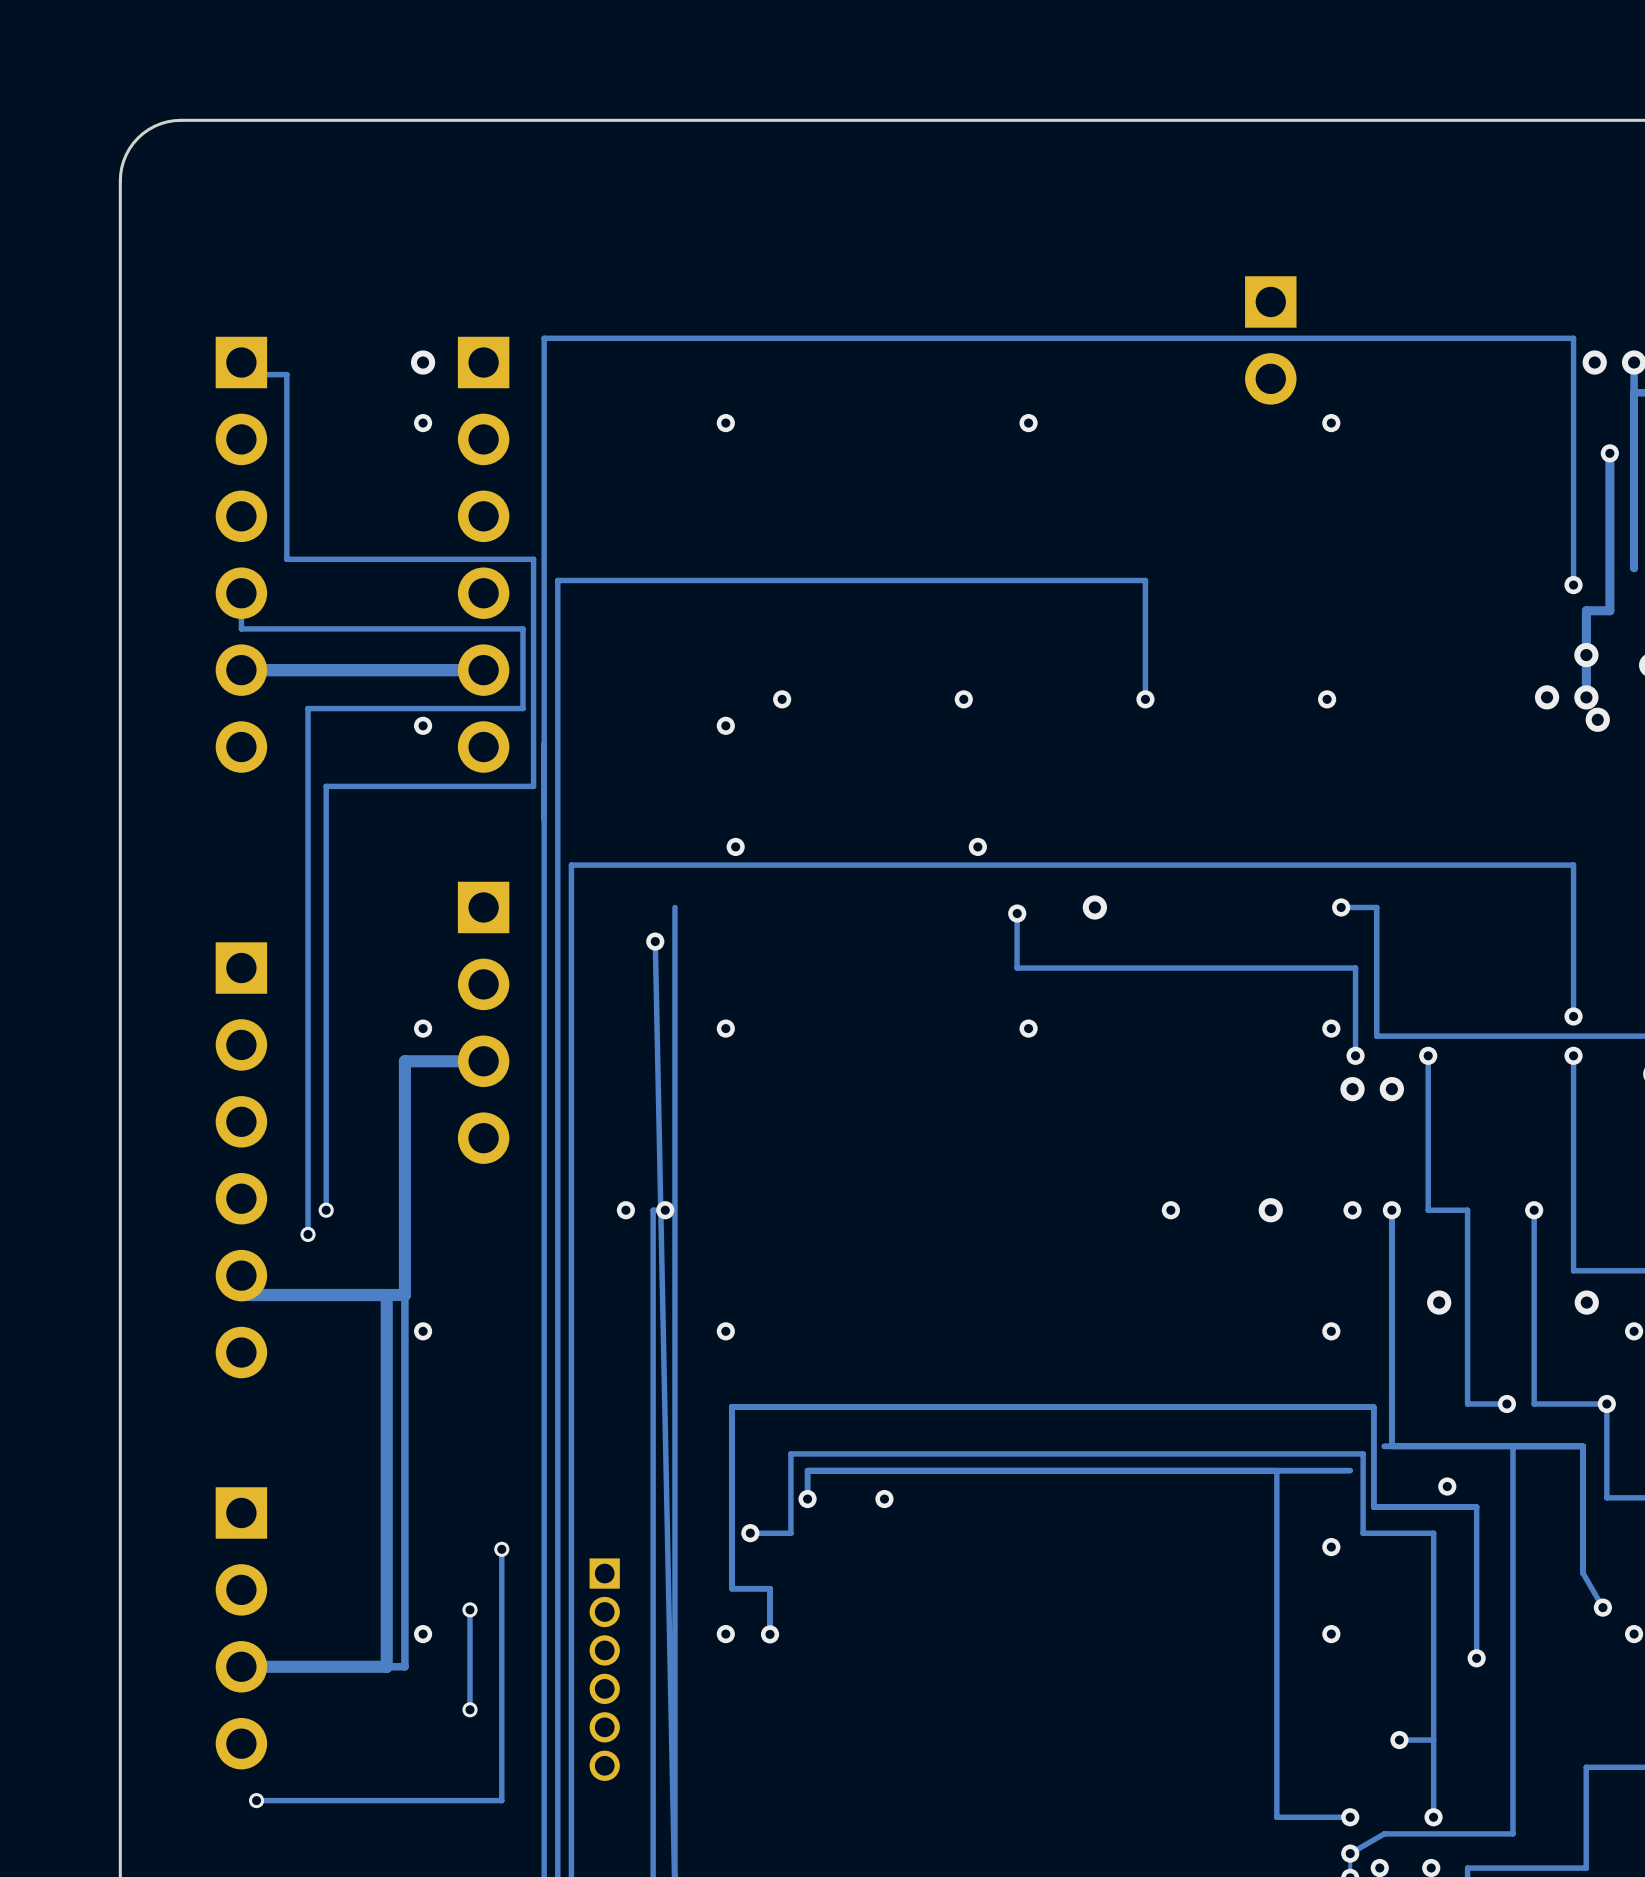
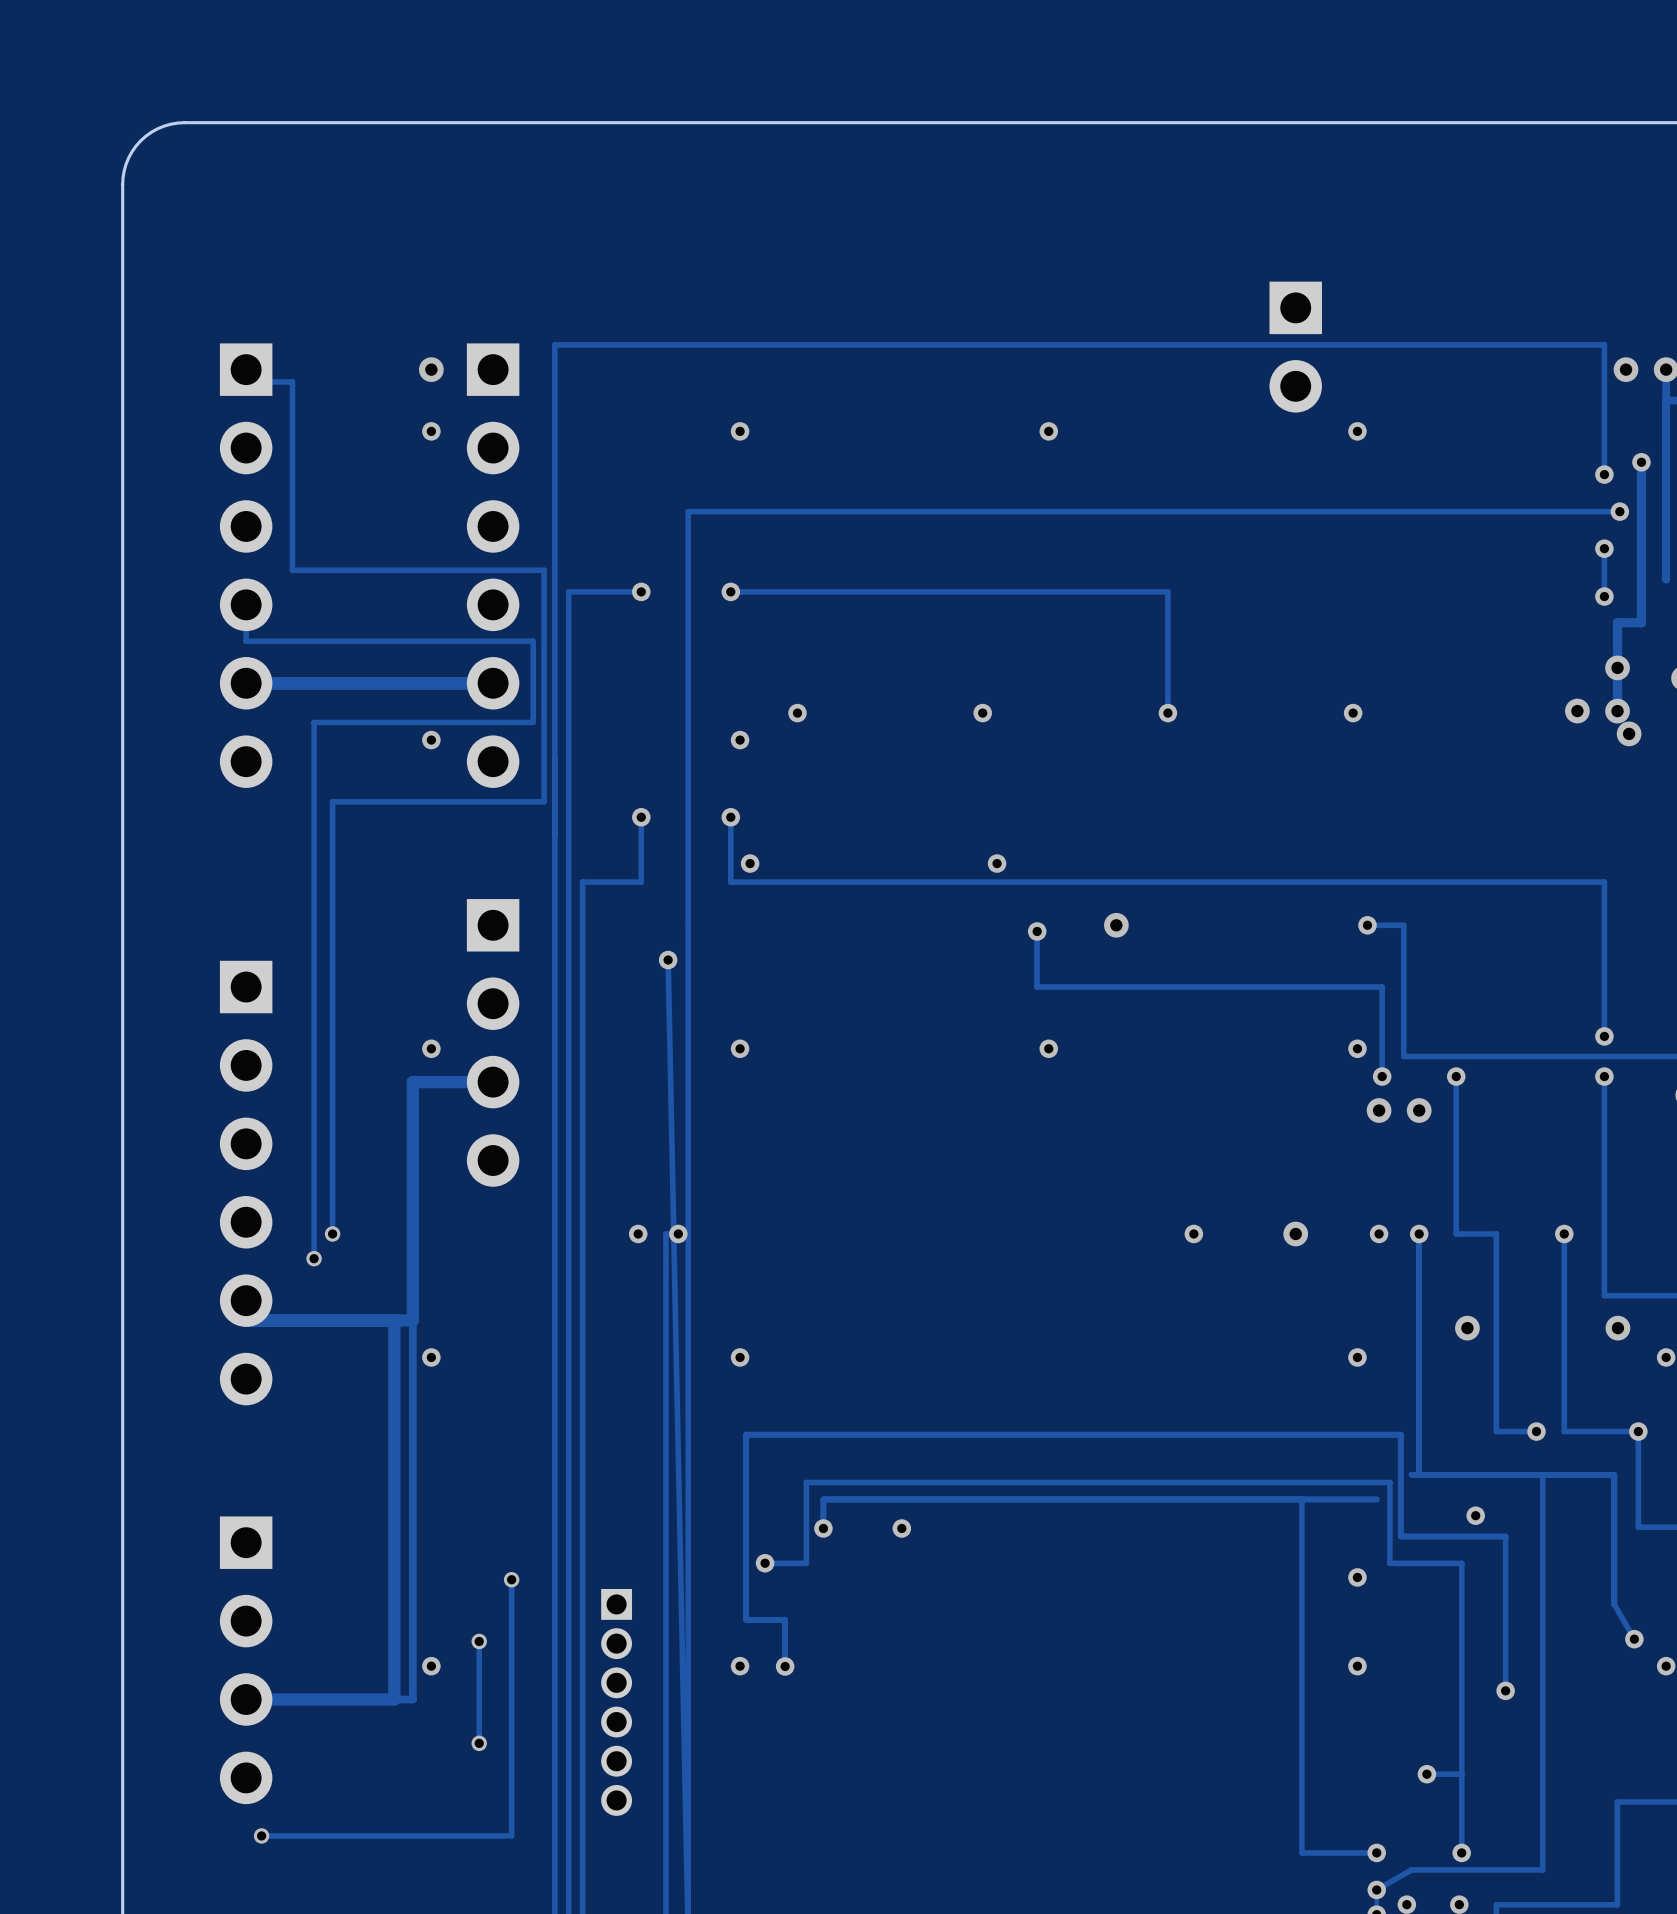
track: (1573, 465) (1573, 538) -> none
via: none -> (1604, 474)
track: none -> (1619, 511) (688, 511) (688, 925)
via: none -> (1619, 511)
via: none -> (1604, 548)
via: none -> (641, 591)
track: (716, 580) (628, 580) -> none
via: none -> (730, 591)
track: none -> (641, 817) (641, 882)
via: none -> (641, 817)
via: none -> (730, 817)
track: (716, 865) (628, 865) -> (730, 882) (730, 817)

